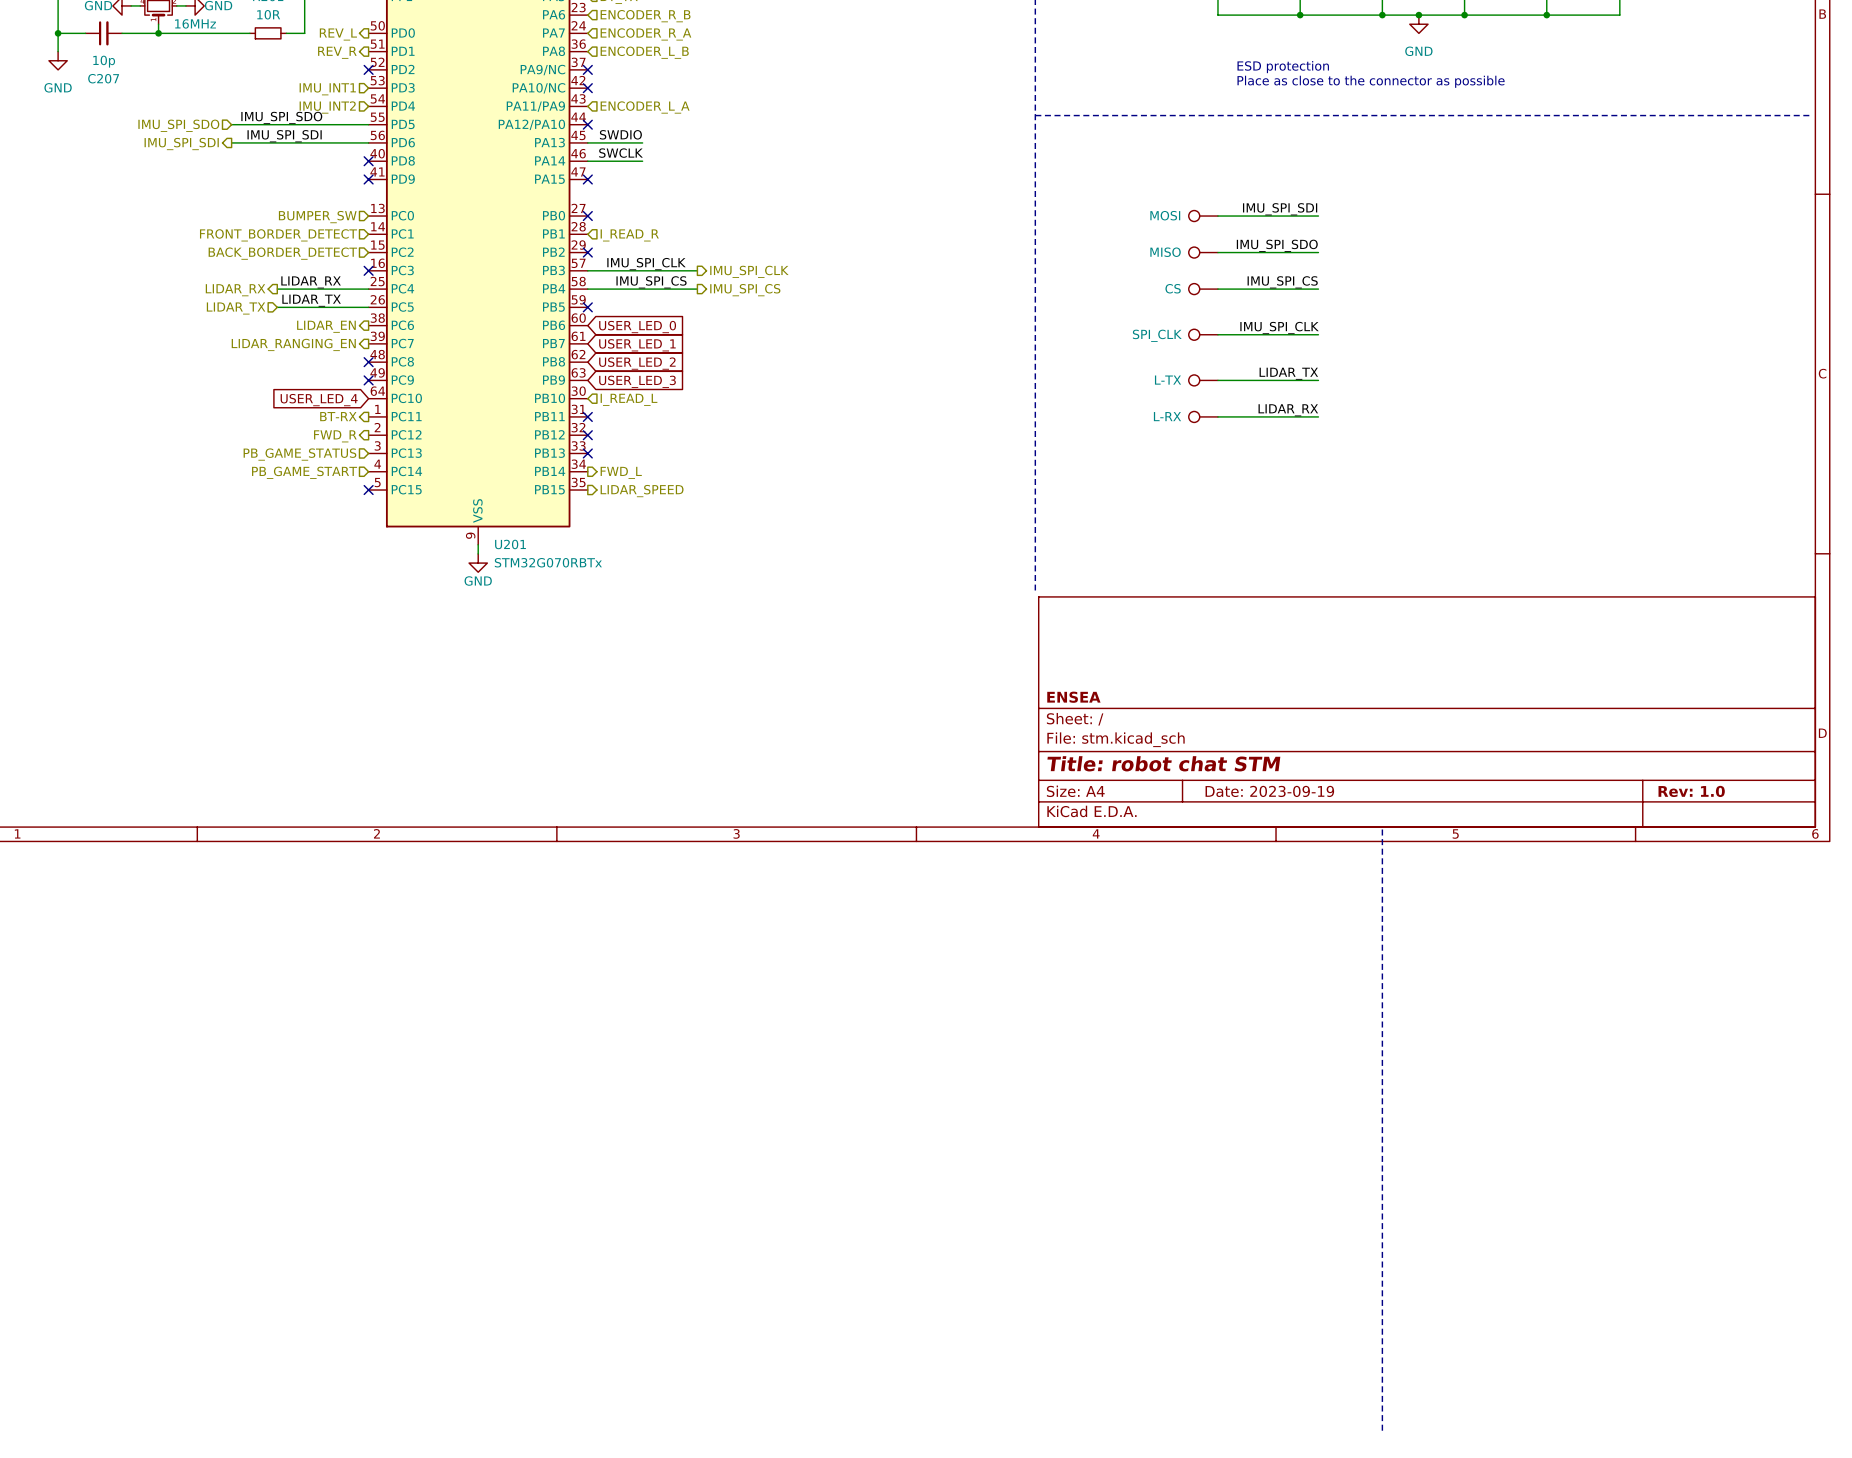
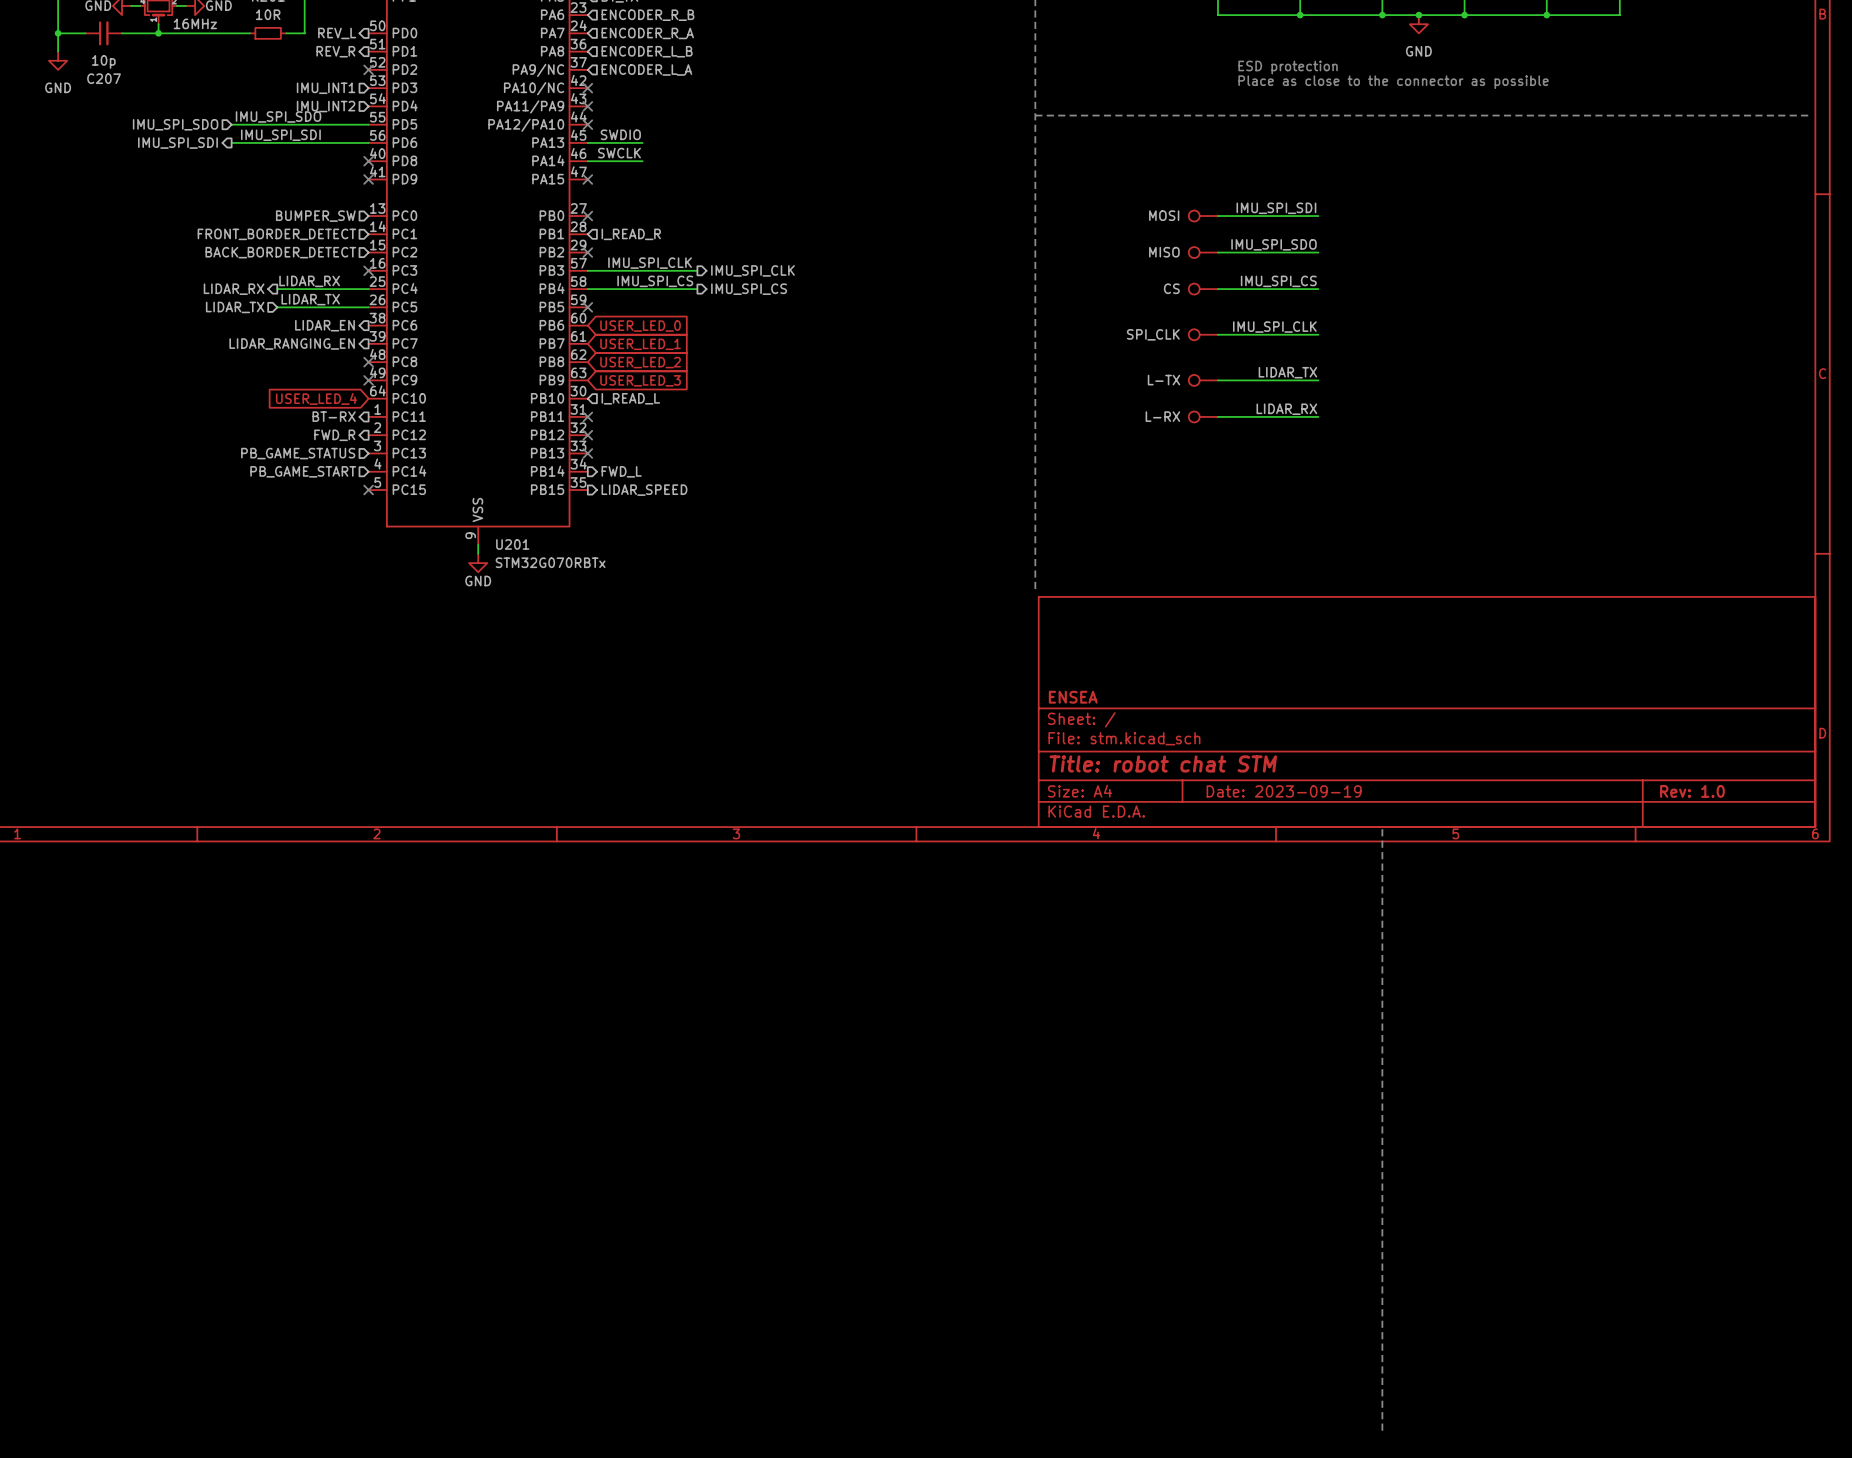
no-connect mark position: (587, 69) -> (587, 106)
hierarchical label position: ENCODER_L_A (645, 107) -> ENCODER_L_A (646, 69)

